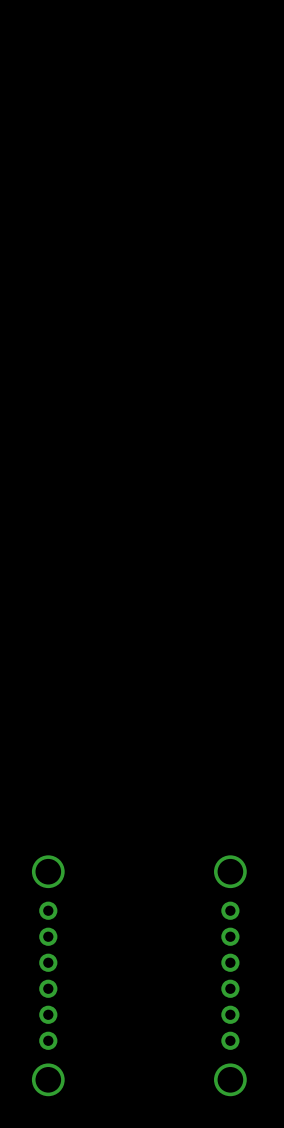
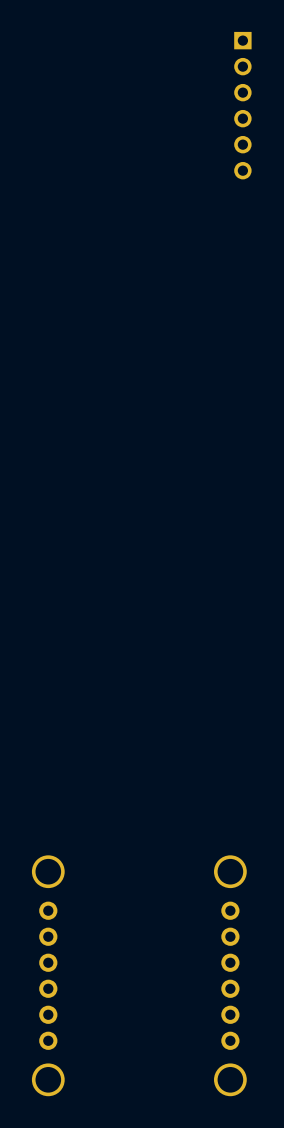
part: none -> (242, 105)

